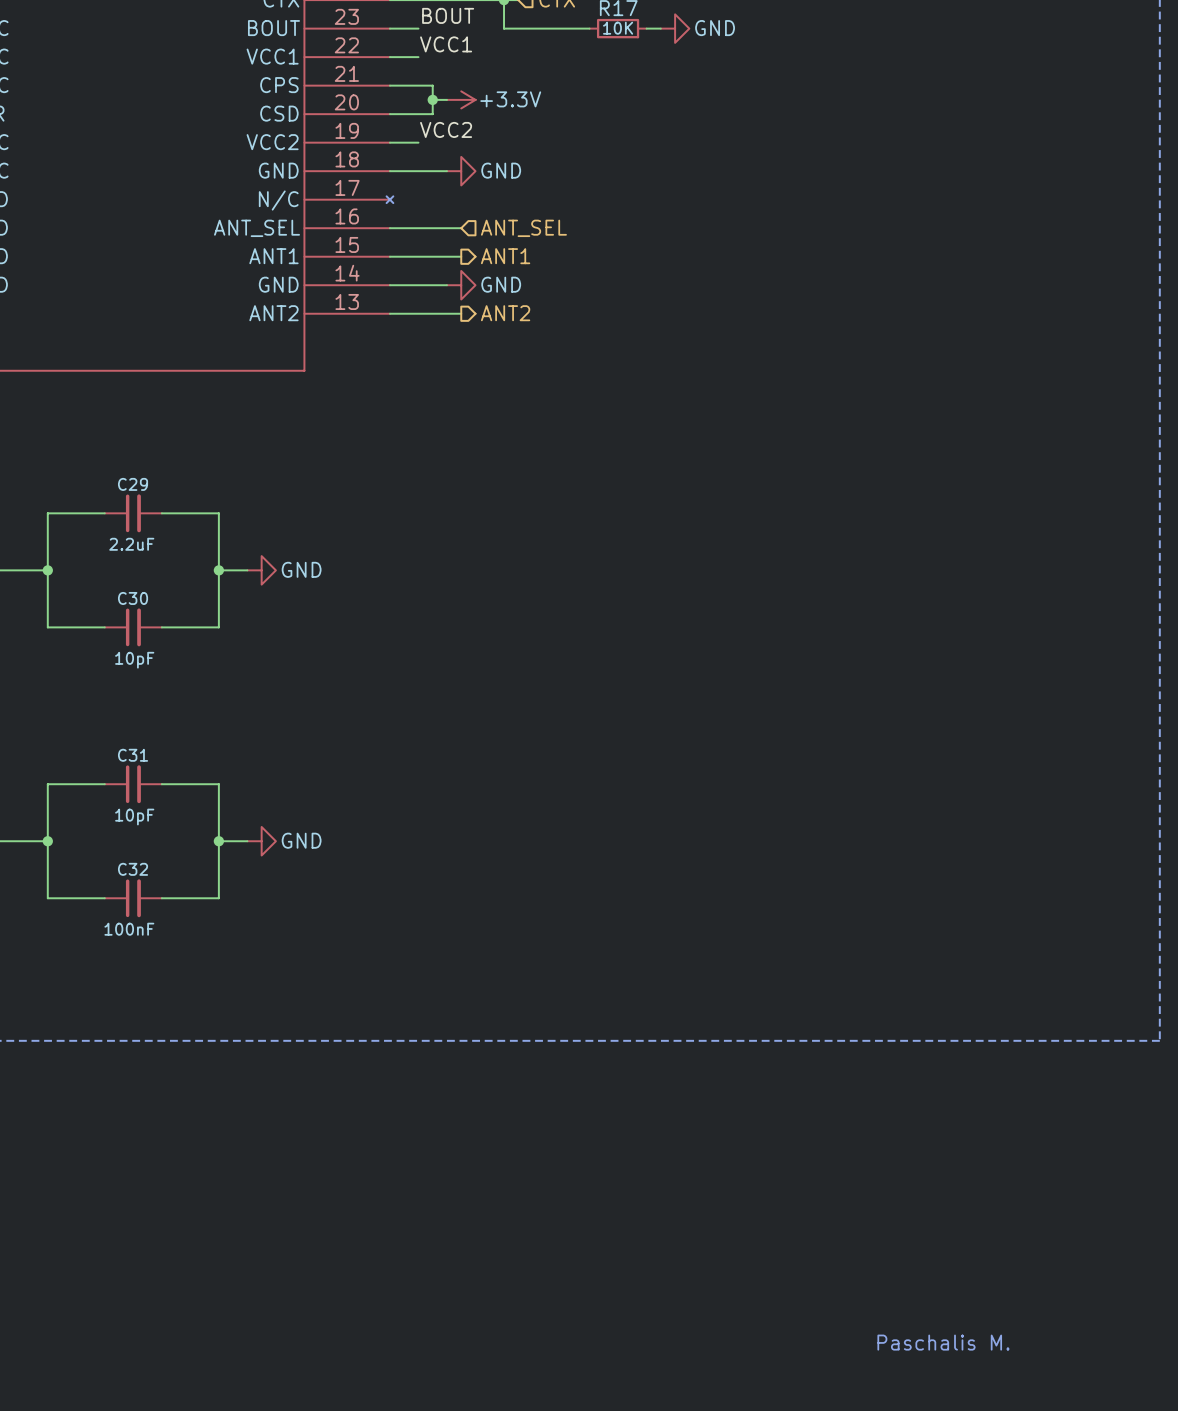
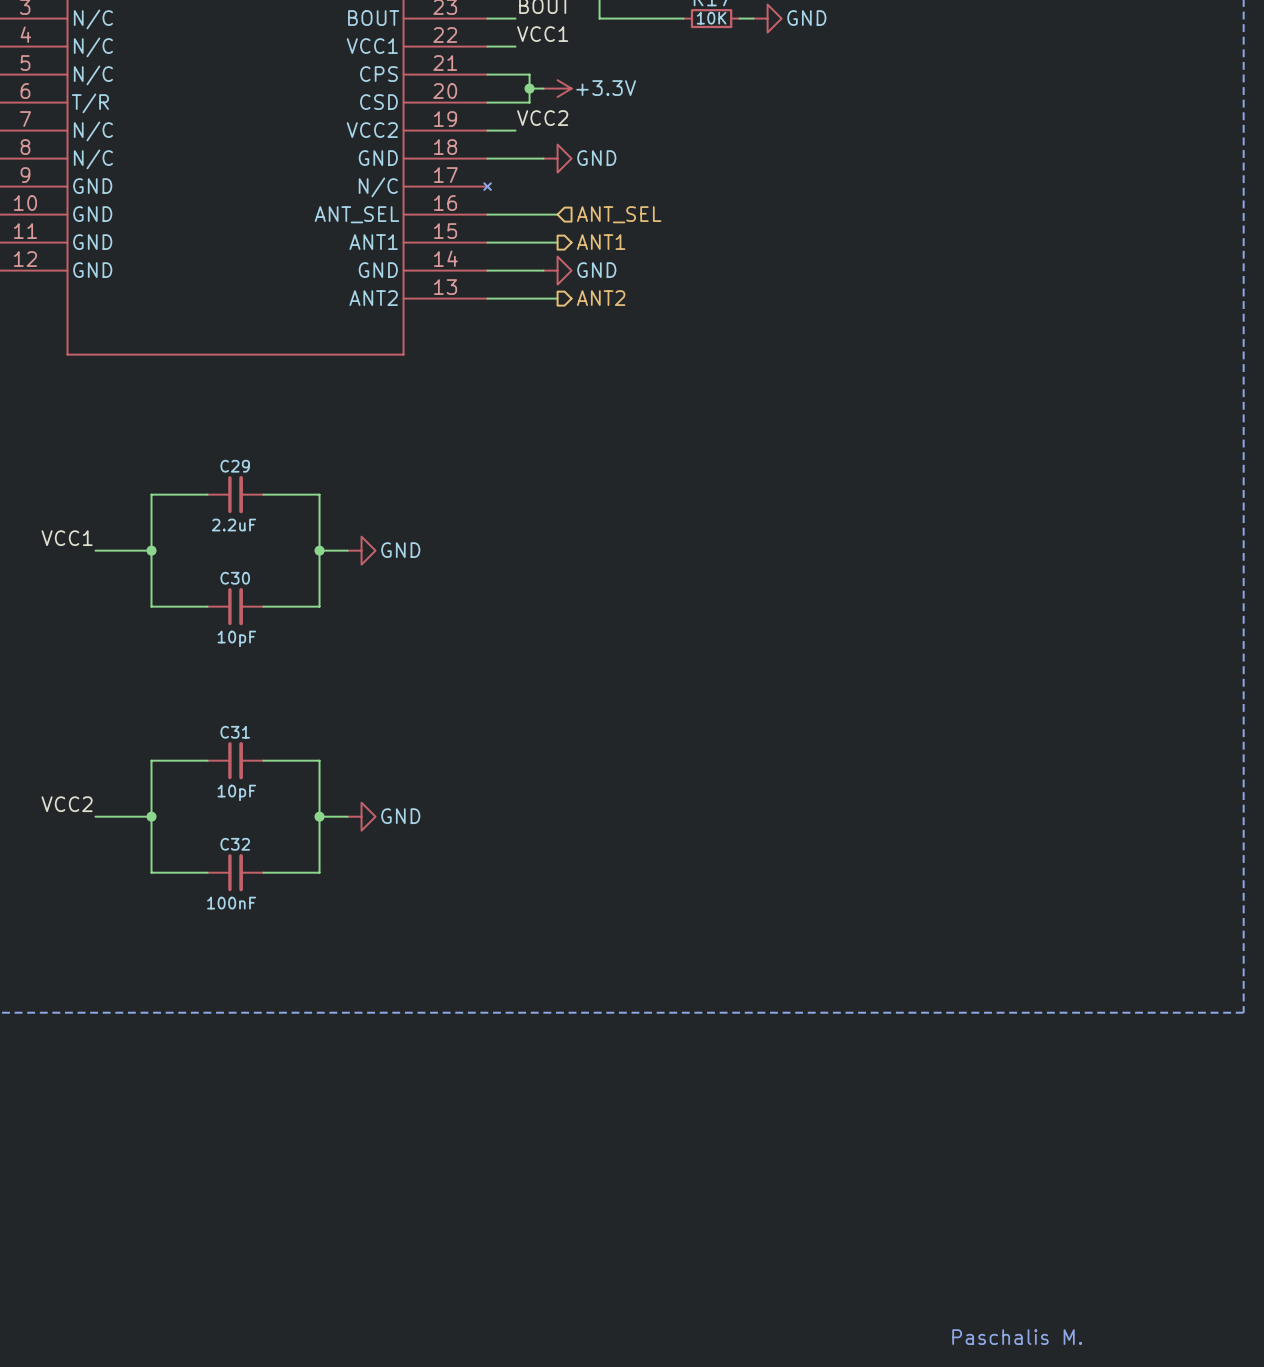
text position: Paschalis M. (943, 1342) -> Paschalis M. (1017, 1337)

